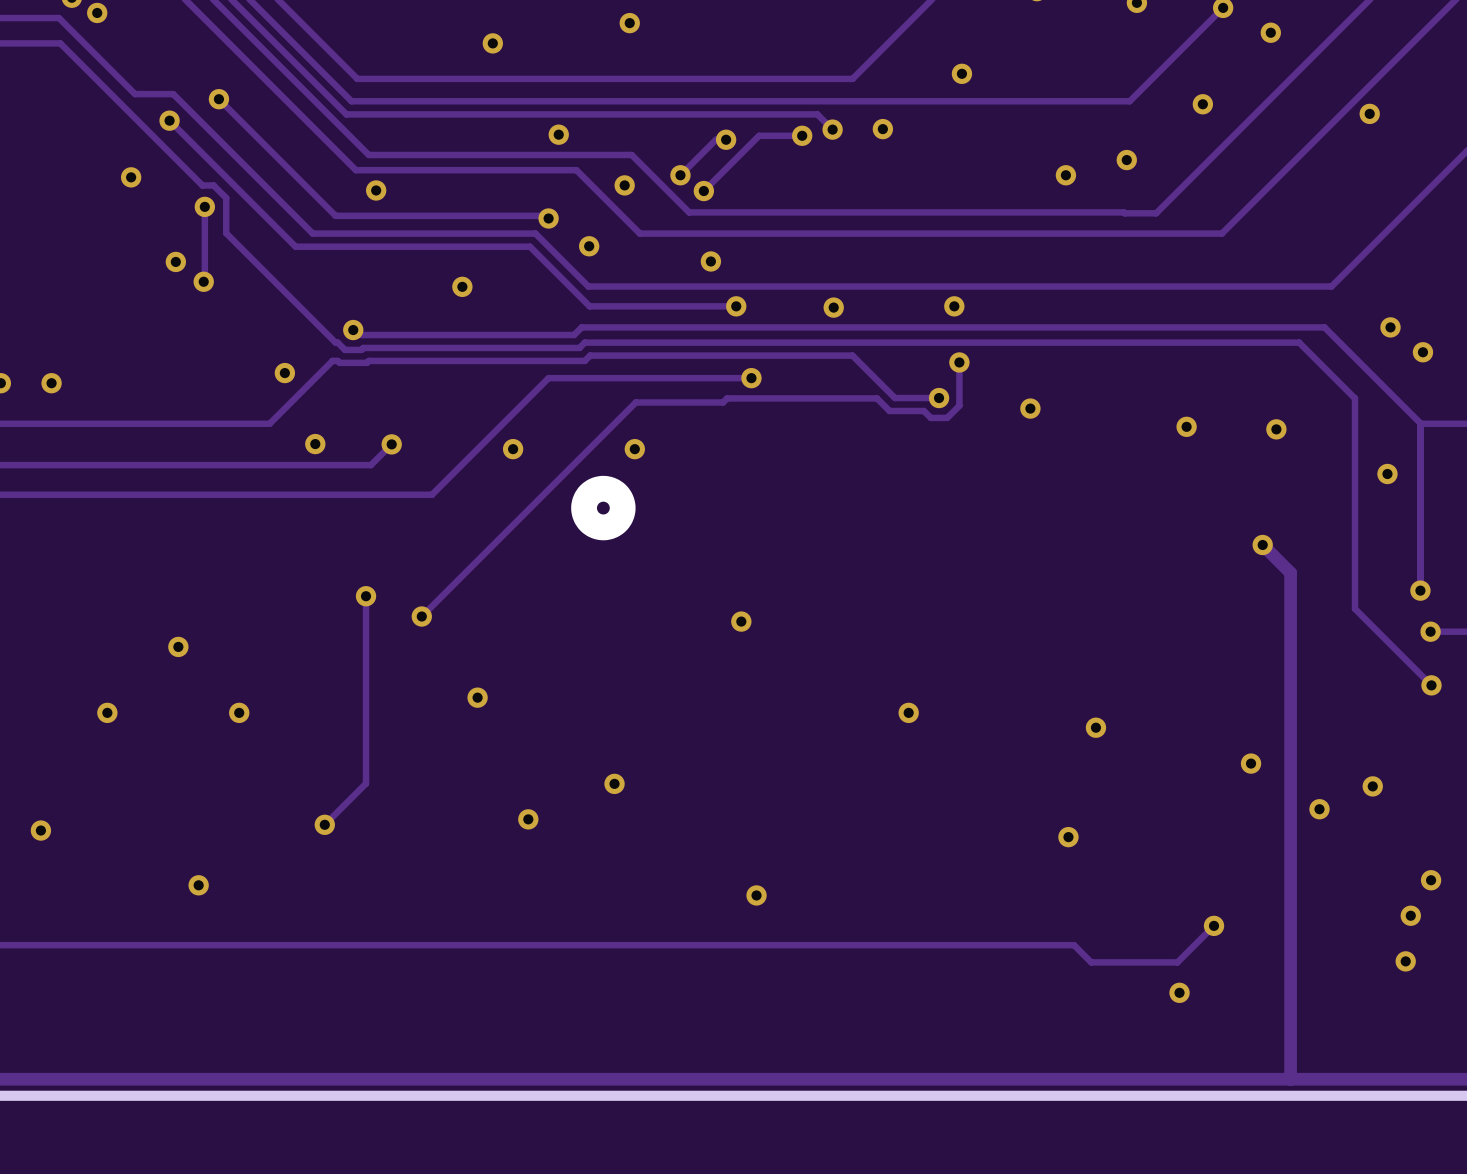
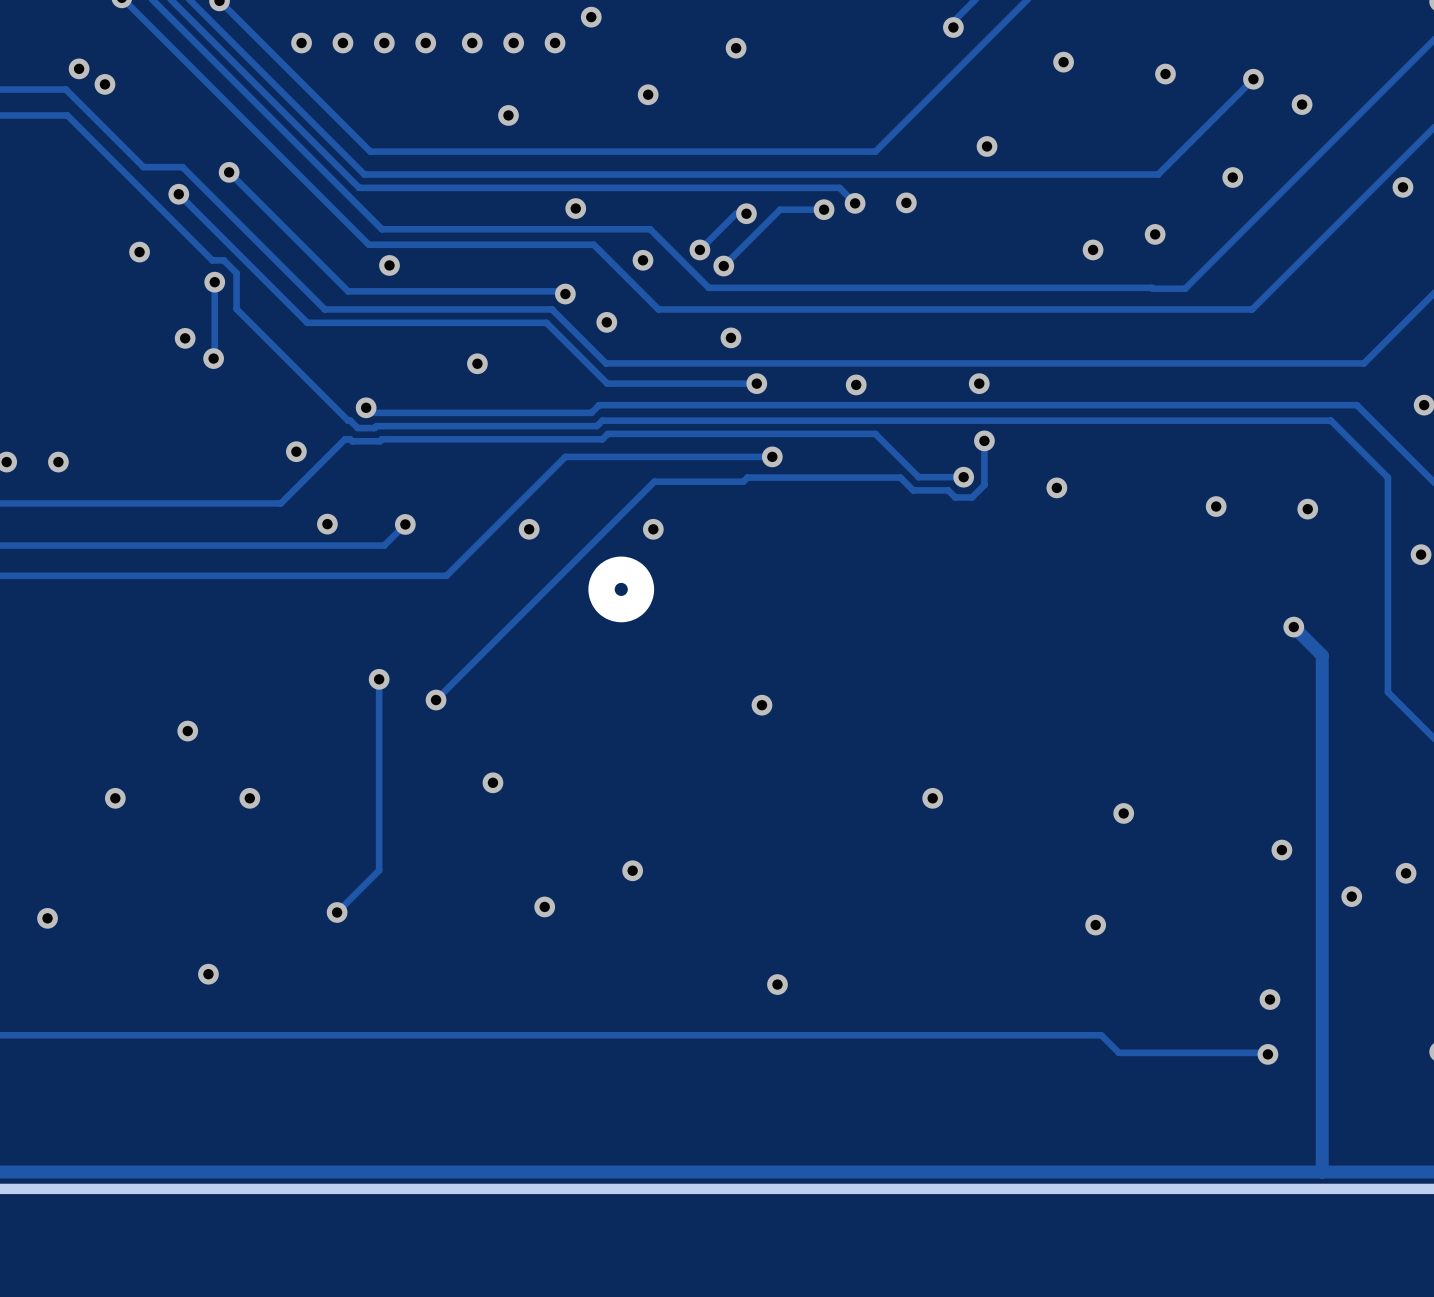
via: none -> (1269, 999)
track: (1214, 925) (1177, 962) -> (1267, 1054) (1266, 1052) (1206, 1052)
via: (1214, 925) -> none
via: none -> (1267, 1054)
via: (1179, 992) -> none

